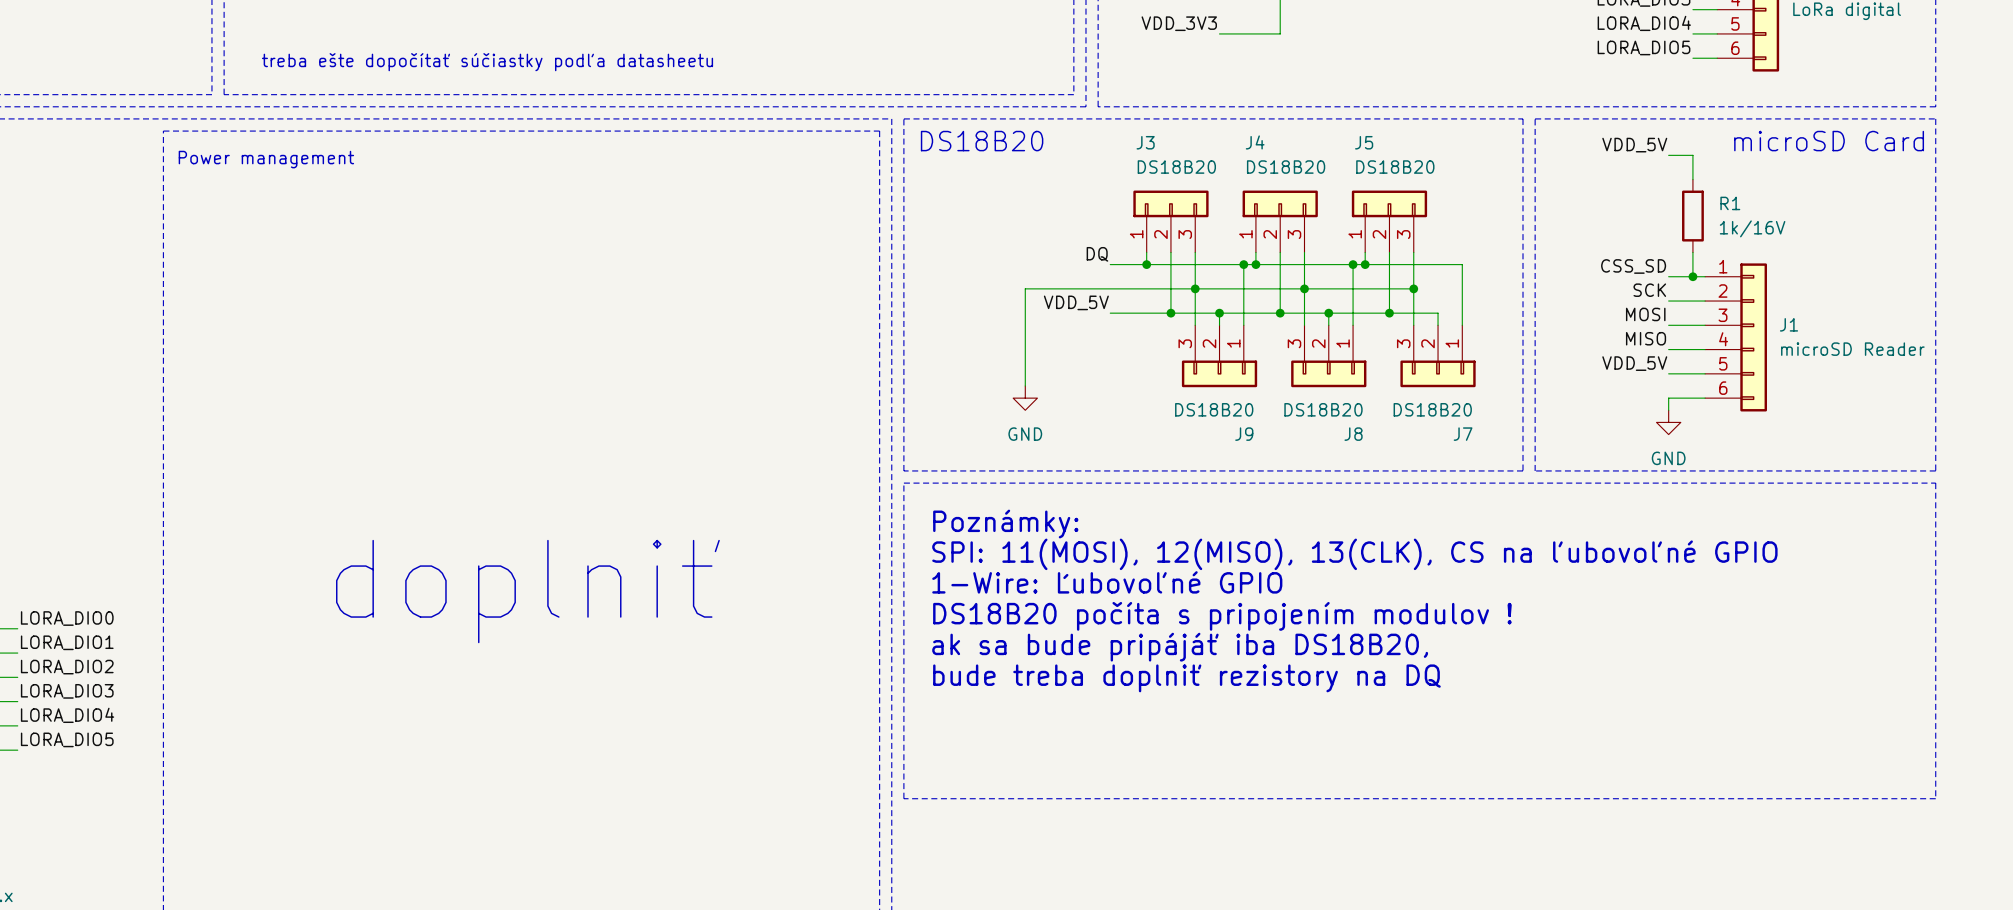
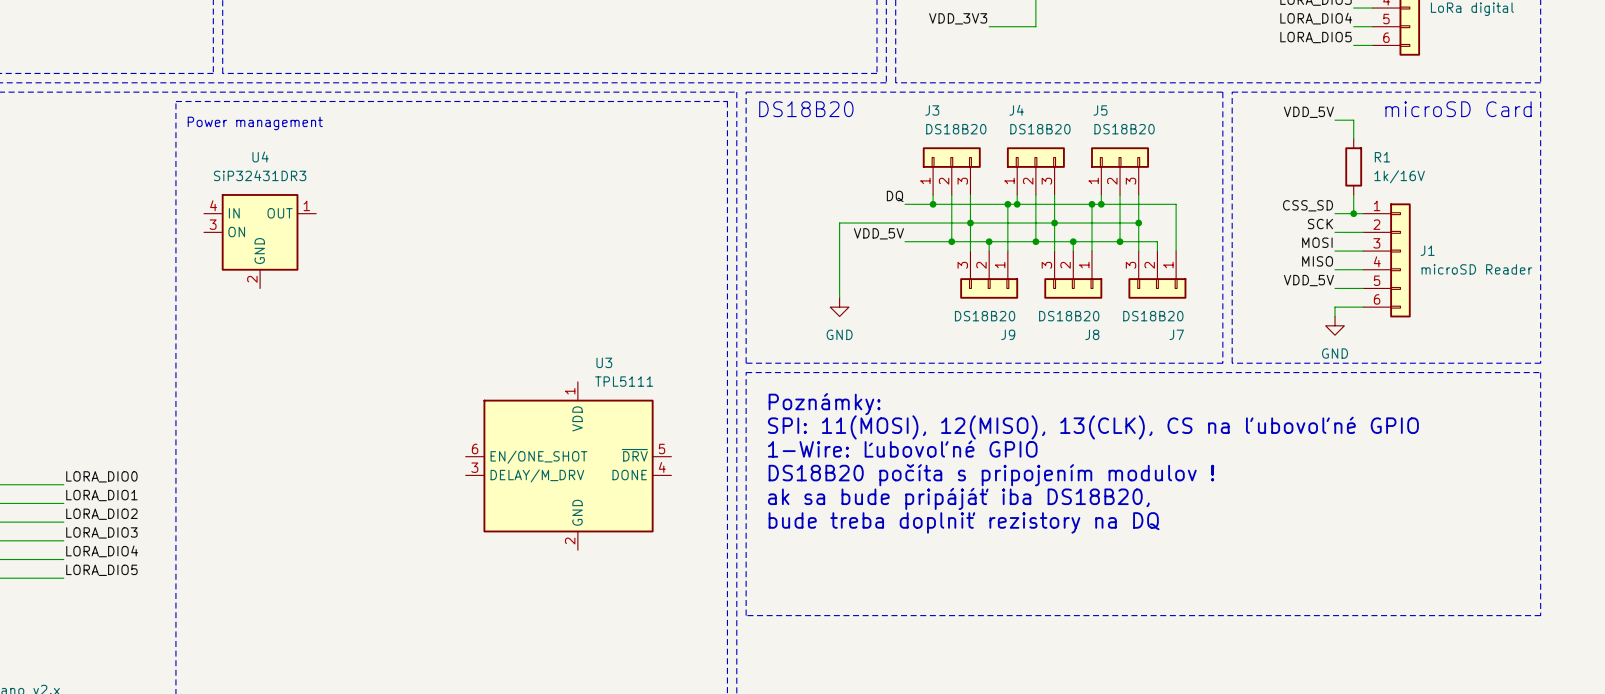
text: treba ešte dopočítať súčiastky podľa datasheetu (487, 62) -> none
U4: none -> SiP32431DR3 (260, 241)
text: doplniť (527, 591) -> none
U3: none -> TPL5111 (568, 466)

